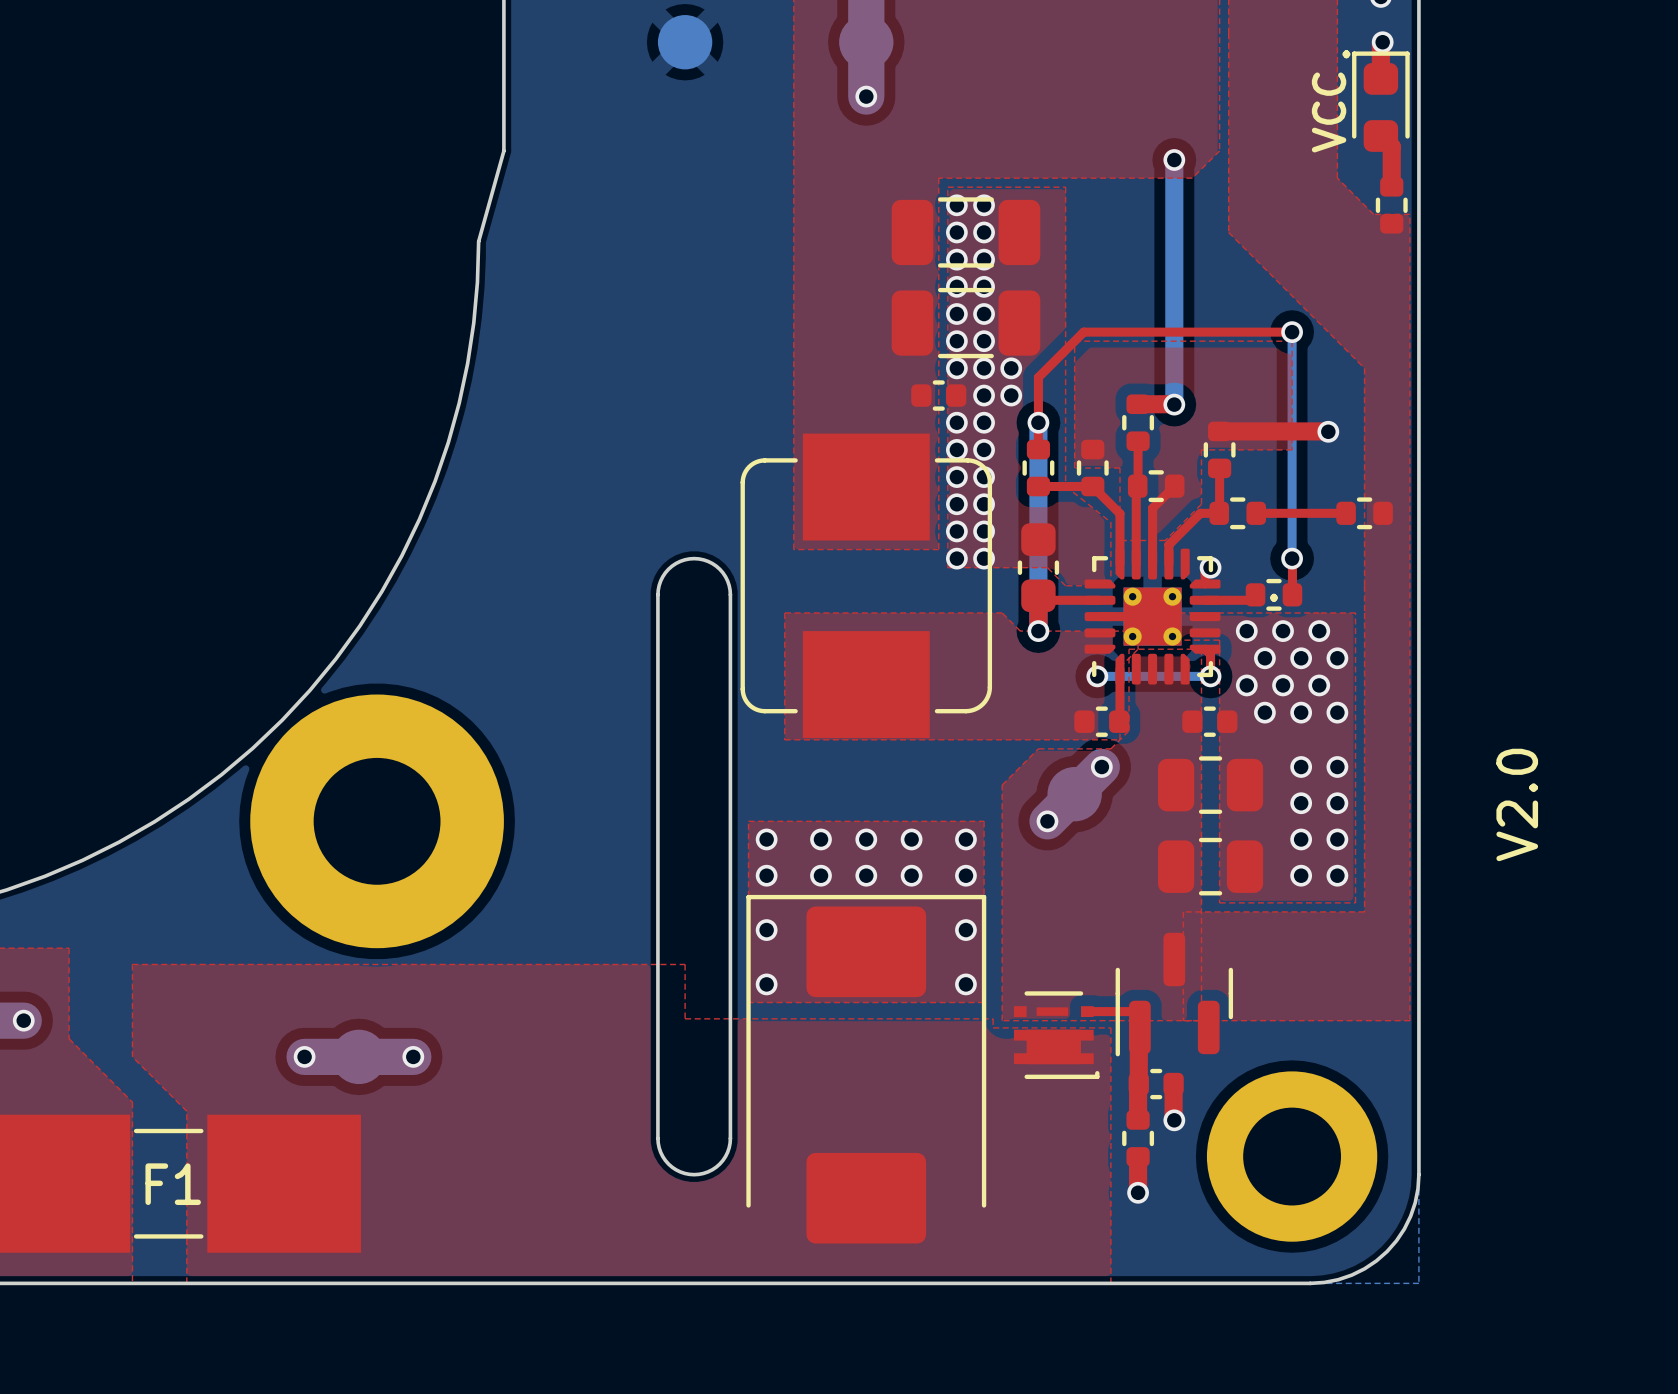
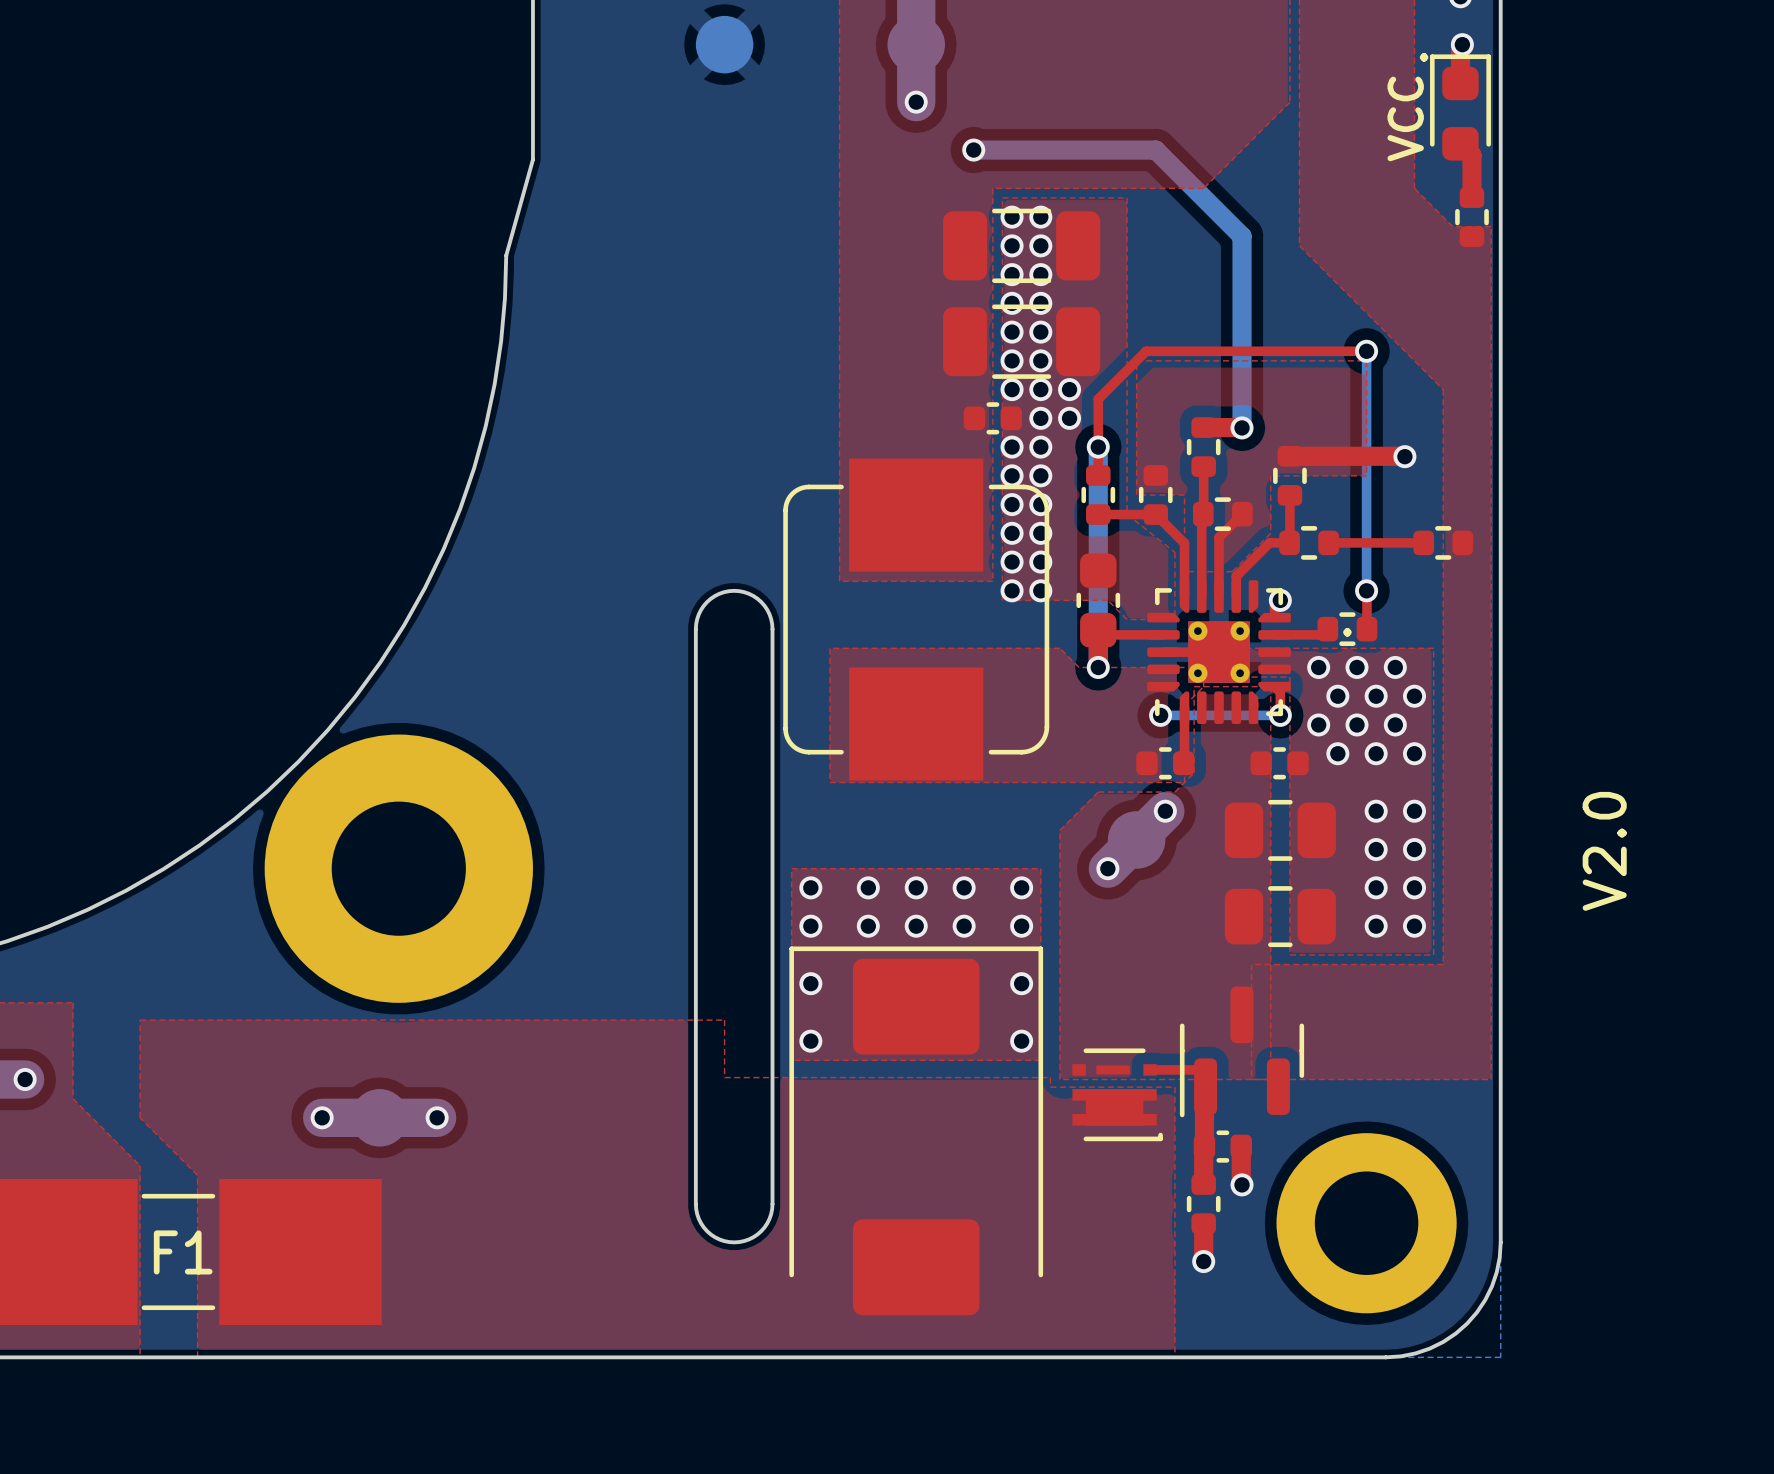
top zone outline: (1219, 96) (1219, 150) (1192, 178) (1138, 178) -> (1289, 102) (1203, 188)
via: none -> (973, 150)
bottom track: (1174, 159) (1174, 223) -> (973, 150) (1155, 150) (1242, 236)
via: (1174, 159) -> none

